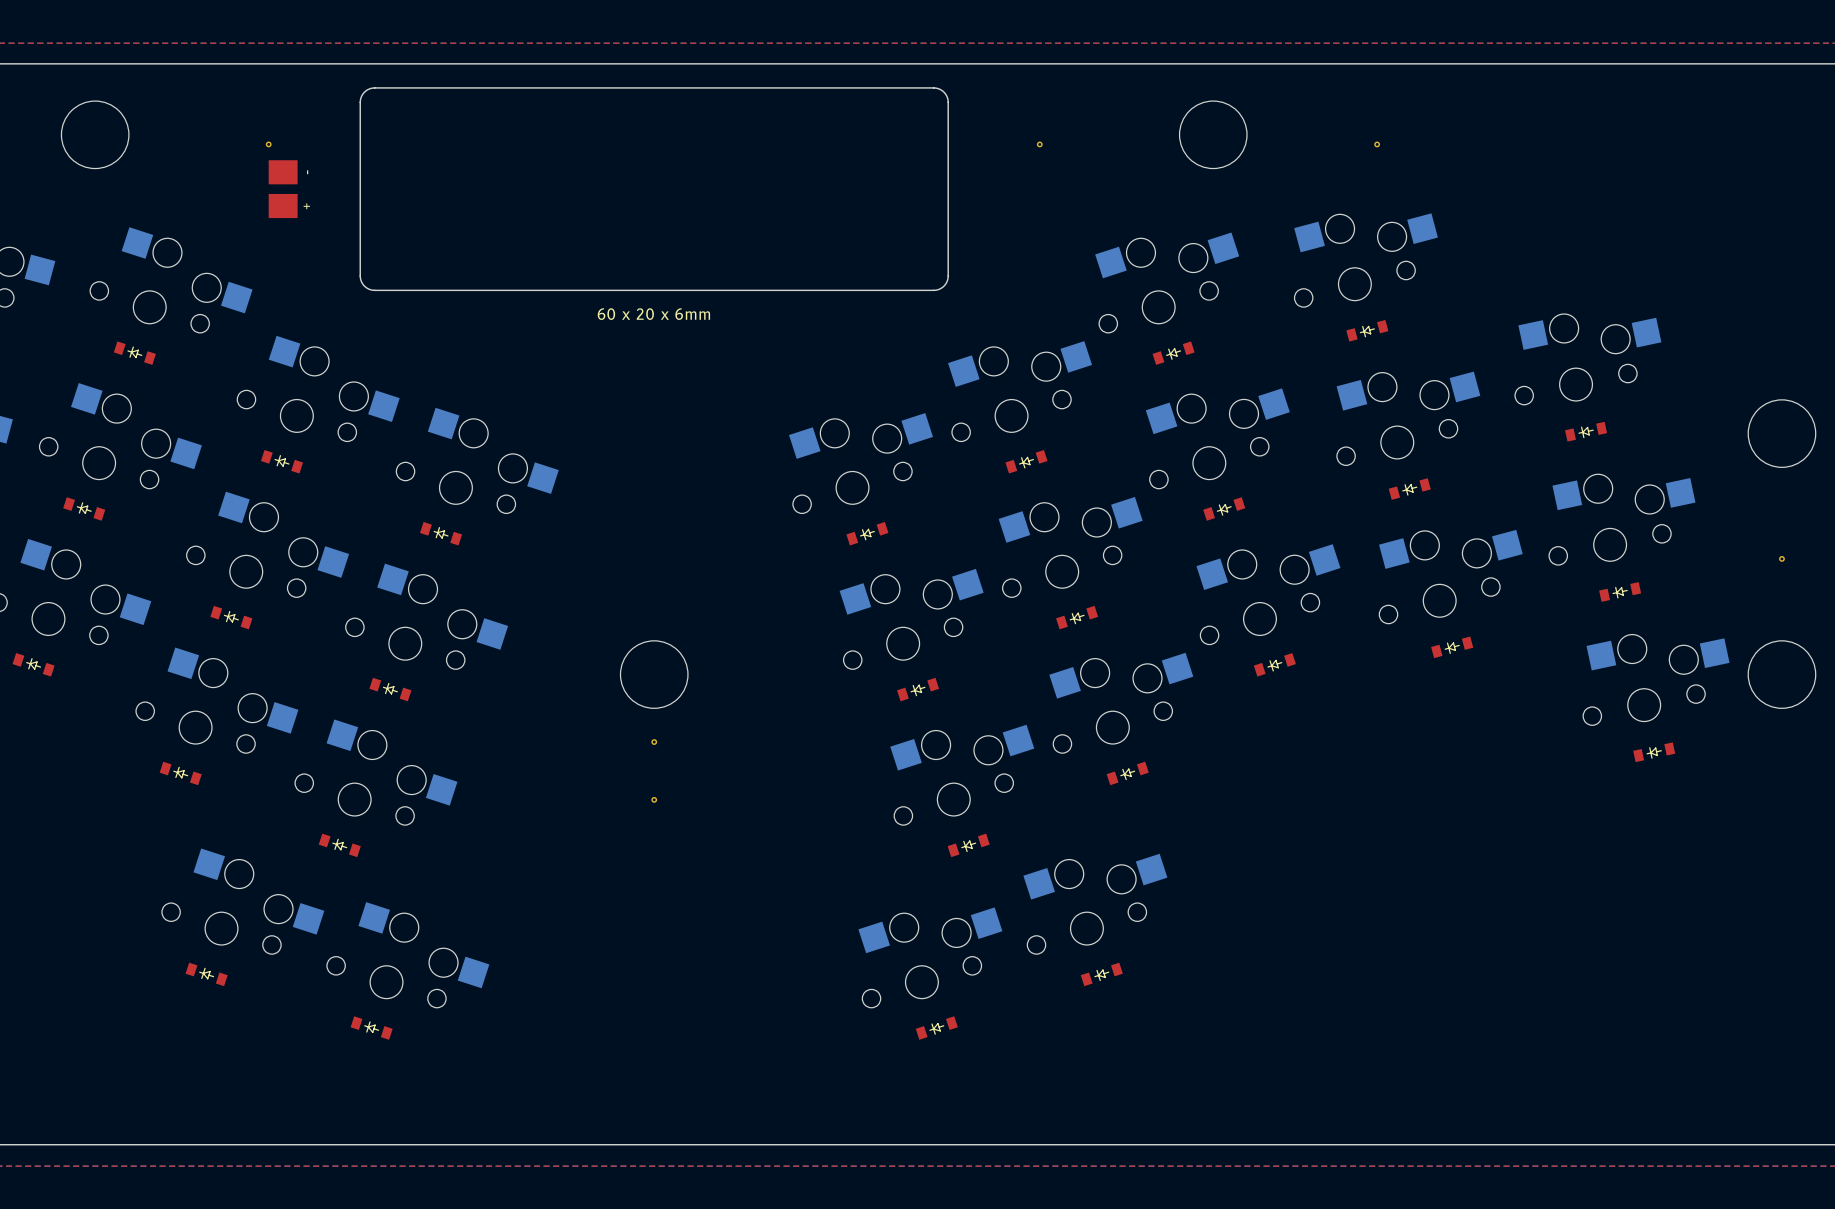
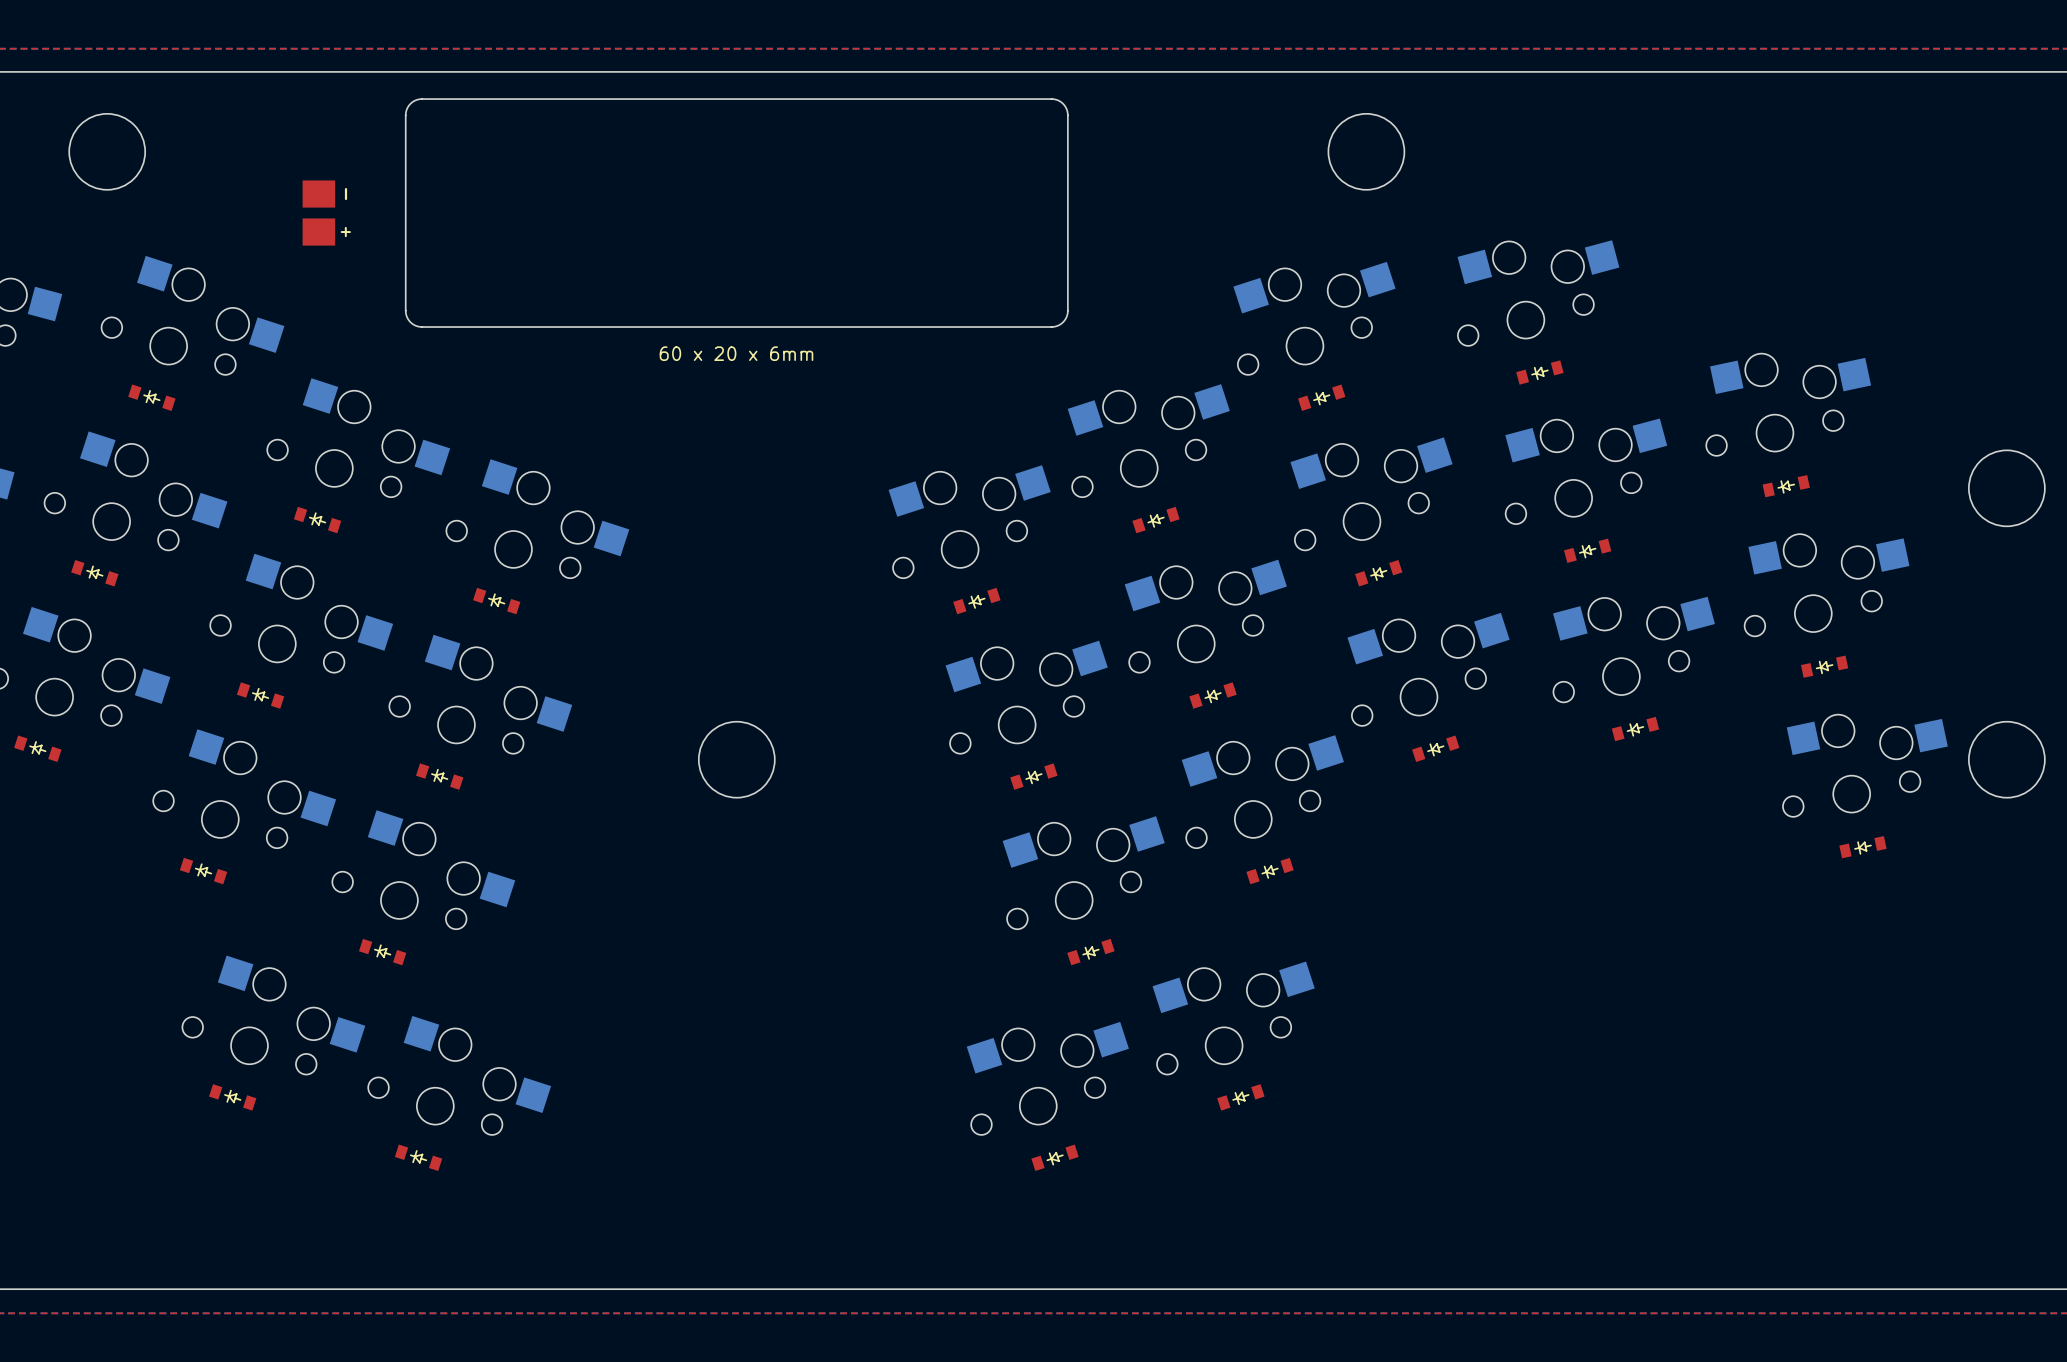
part: (268, 144) -> none
part: (1039, 144) -> none
part: (1377, 144) -> none
part: (1781, 558) -> none
part: (654, 742) -> none
part: (654, 799) -> none

